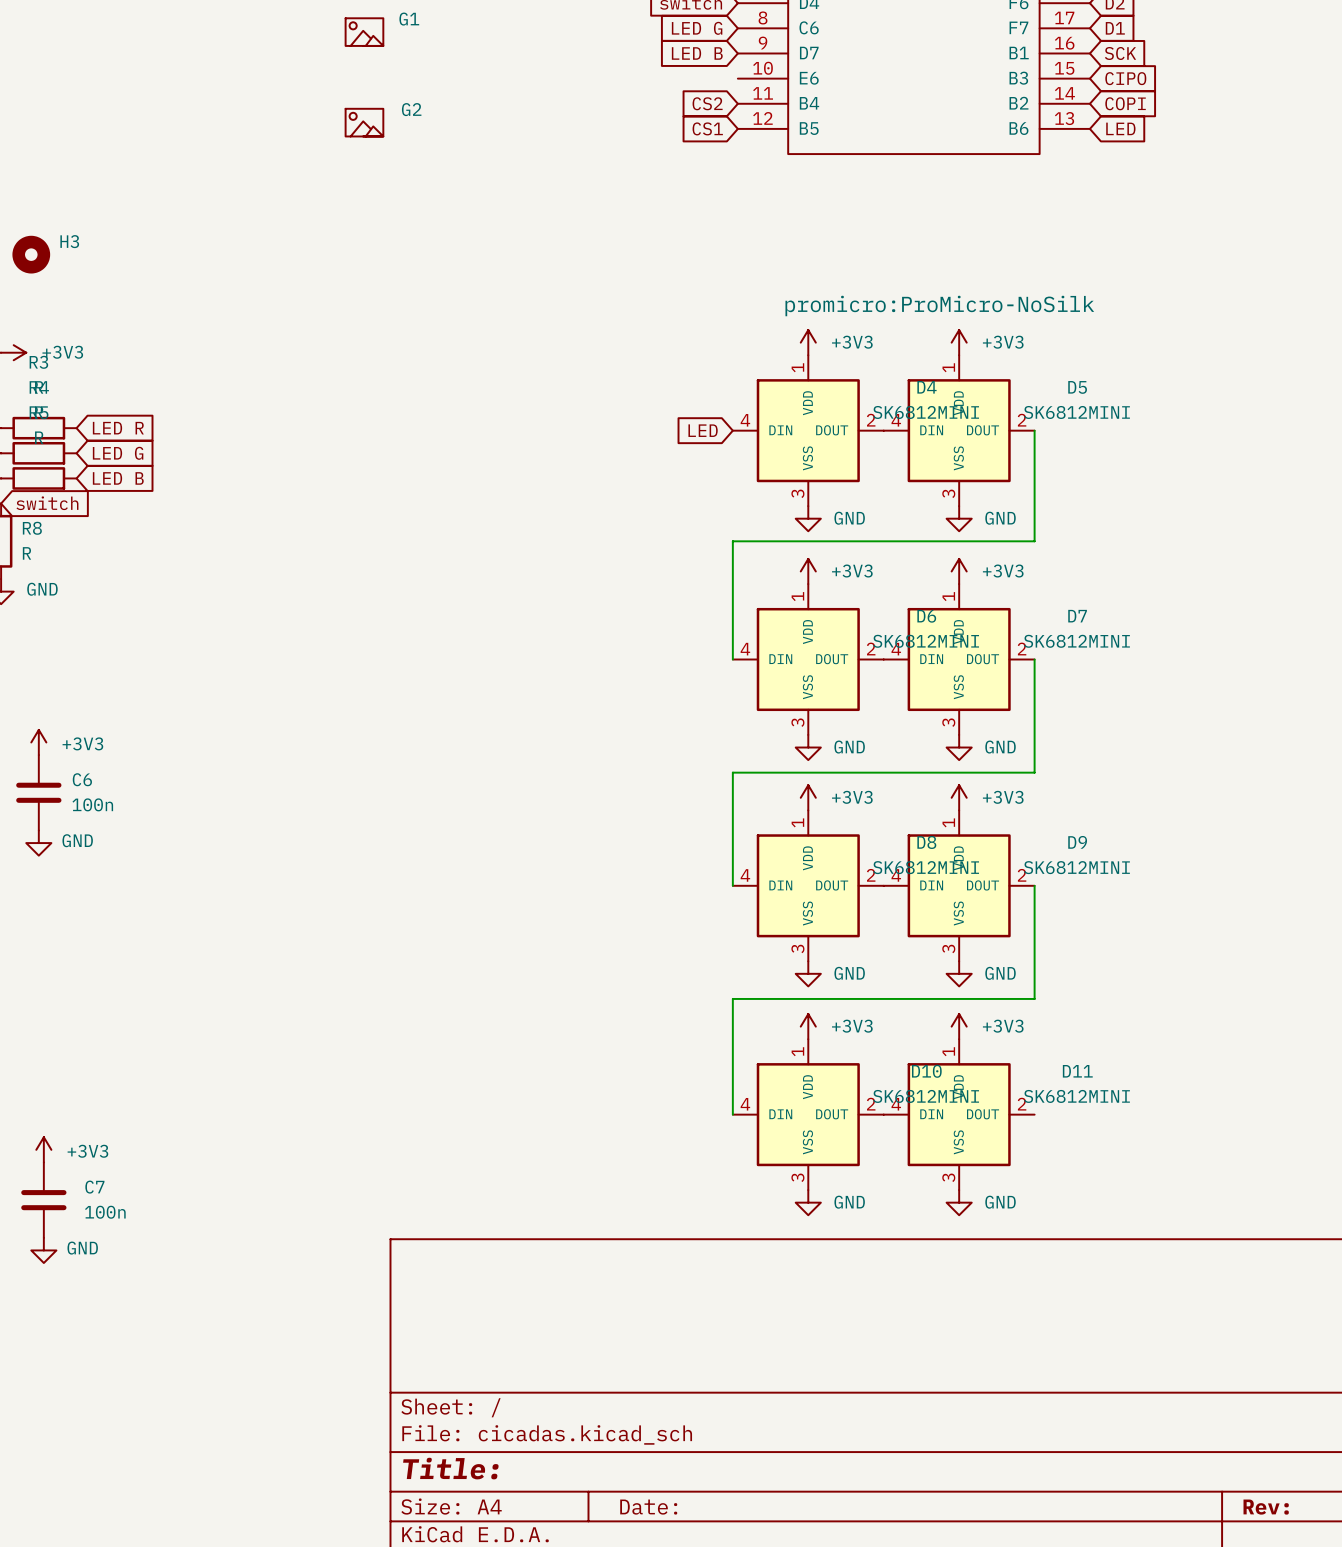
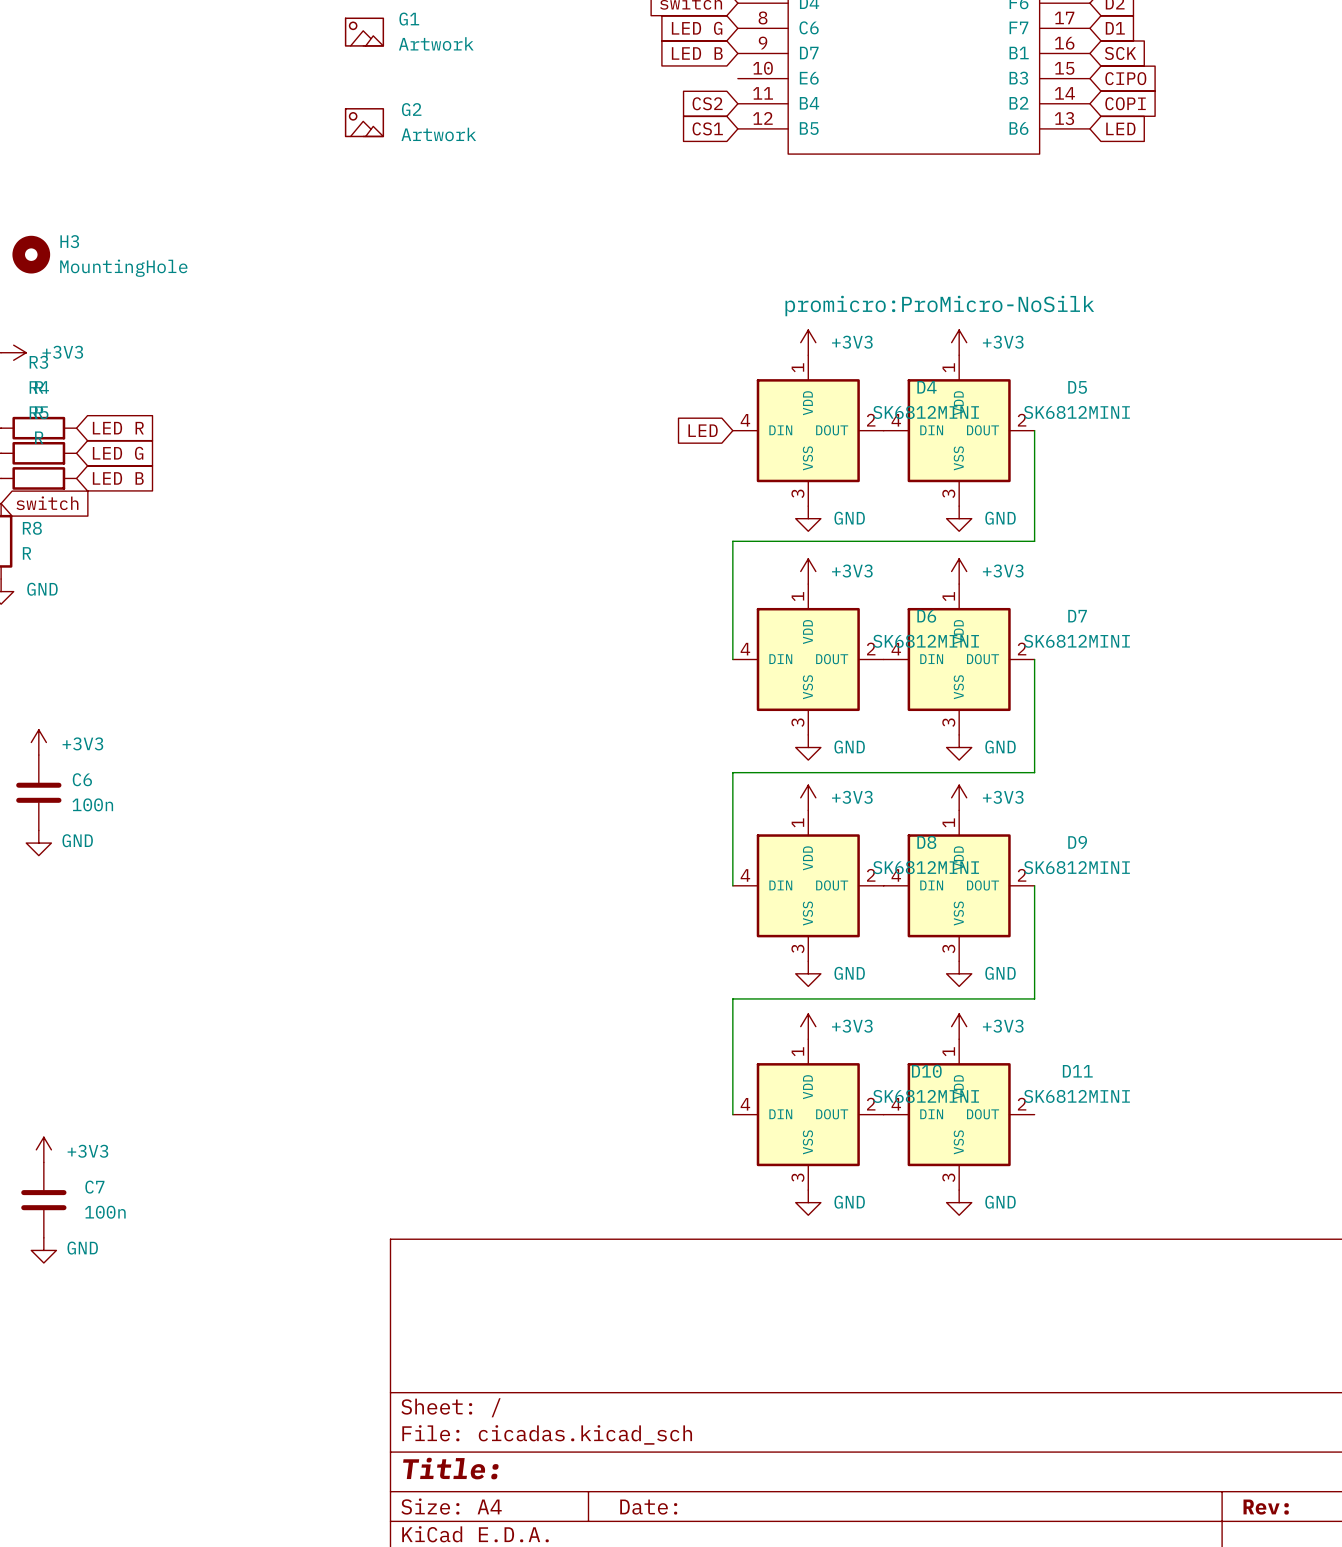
G1 value: none -> Artwork (436, 43)
G2 value: none -> Artwork (438, 134)
H3 value: none -> MountingHole (123, 268)

